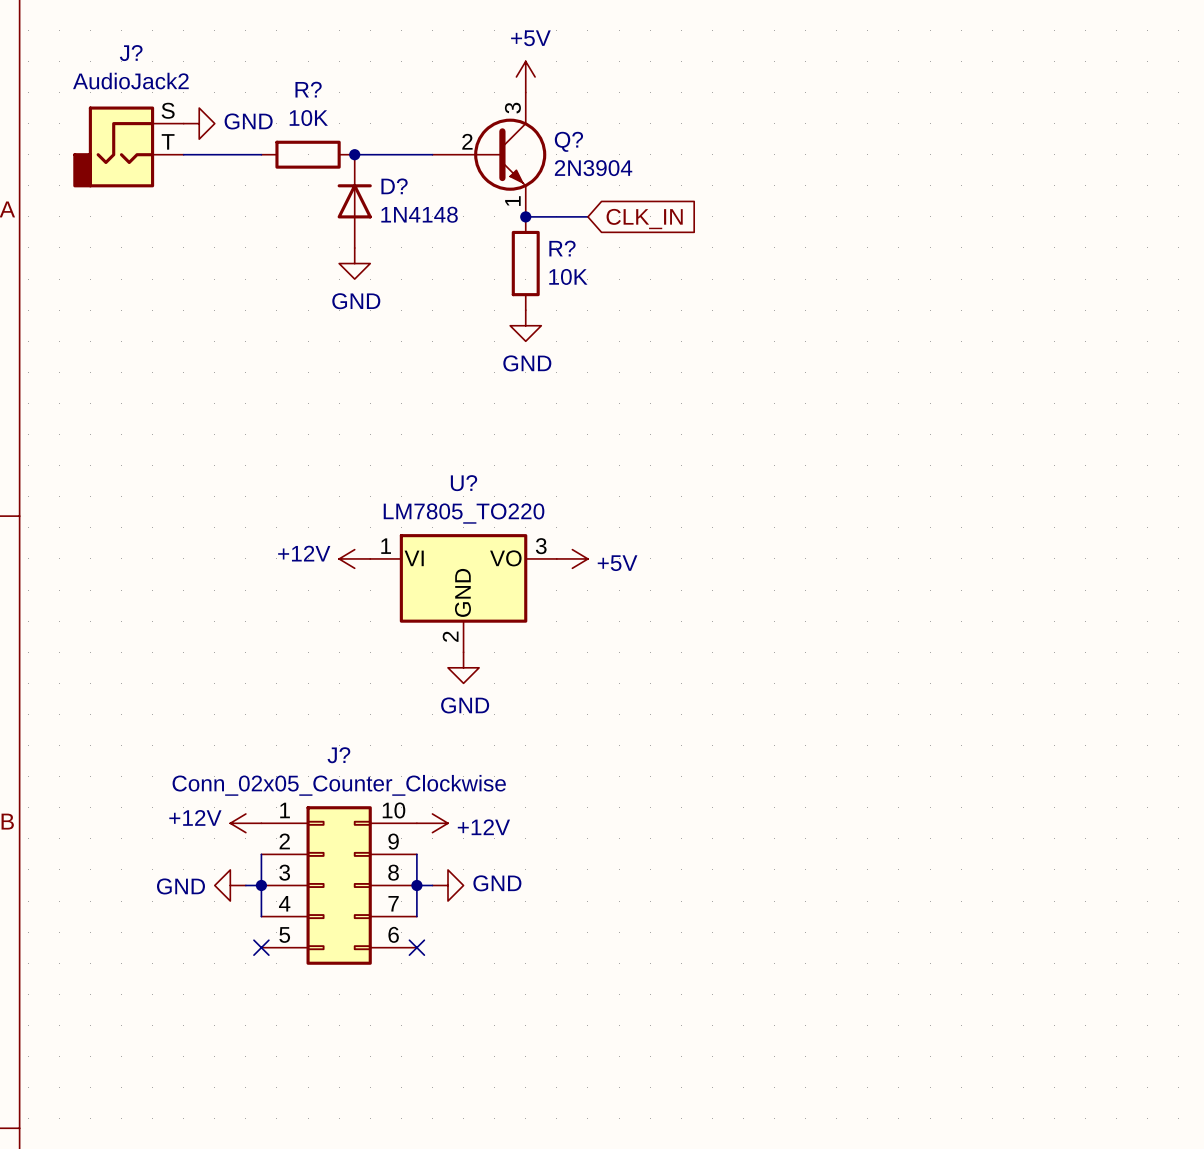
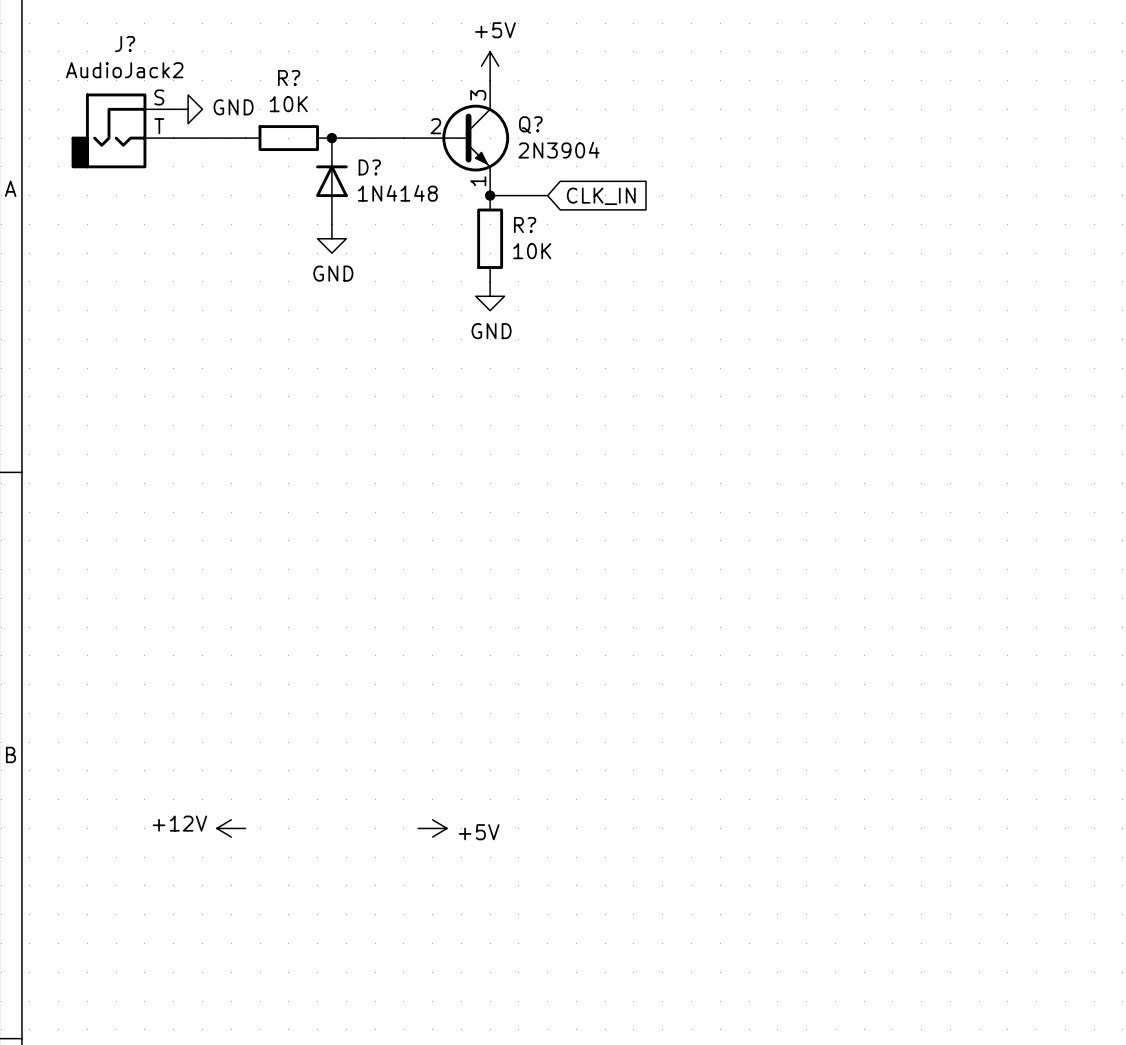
power symbol: +12V (354, 558) -> none
power symbol: +5V (572, 558) -> none
U?: LM7805_TO220 (463, 593) -> none
power symbol: GND (463, 667) -> none
power symbol position: +12V (245, 823) -> +12V (231, 828)
power symbol: +12V (432, 823) -> none
wire: (261, 854) (261, 916) -> none
wire: (416, 854) (416, 916) -> none
power symbol: GND (230, 885) -> none
wire: (245, 885) (261, 885) -> none
junction: (261, 885) -> none
J?: Conn_02x05_Counter_Clockwise (339, 885) -> none
wire: (416, 885) (432, 885) -> none
junction: (416, 885) -> none
power symbol: GND (448, 885) -> none
power symbol: none -> +5V (432, 828)
no-connect mark: (261, 947) -> none
no-connect mark: (416, 947) -> none

